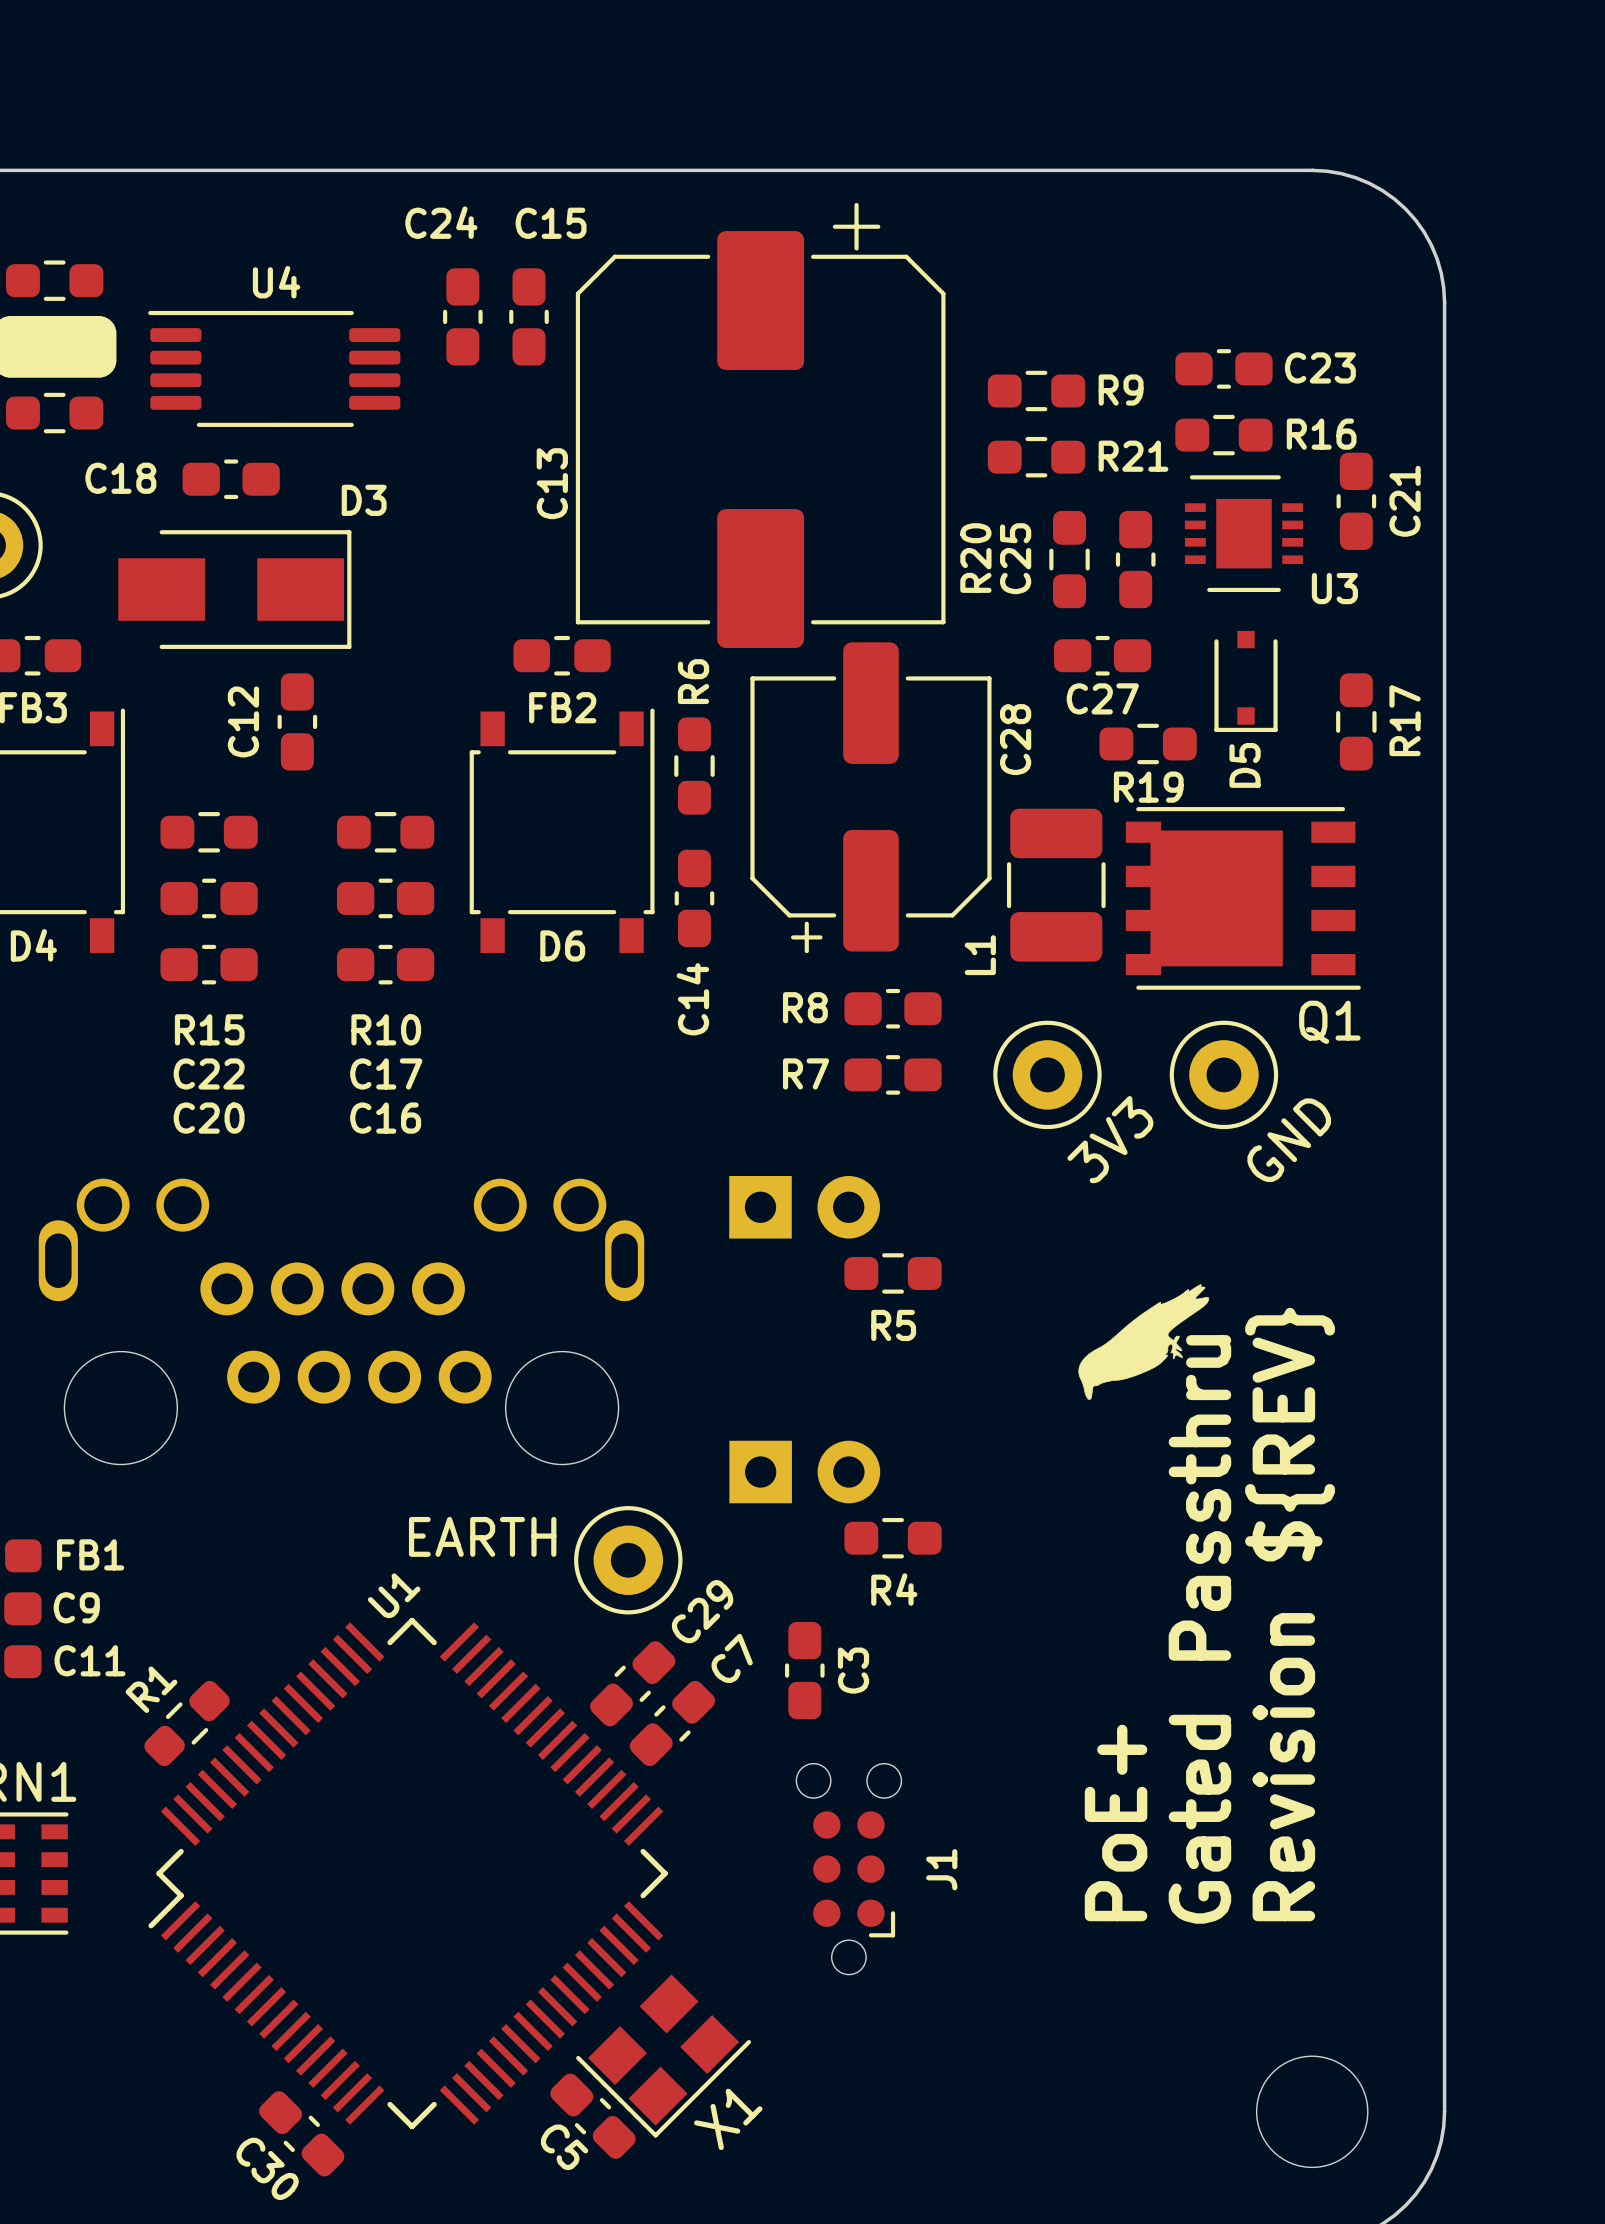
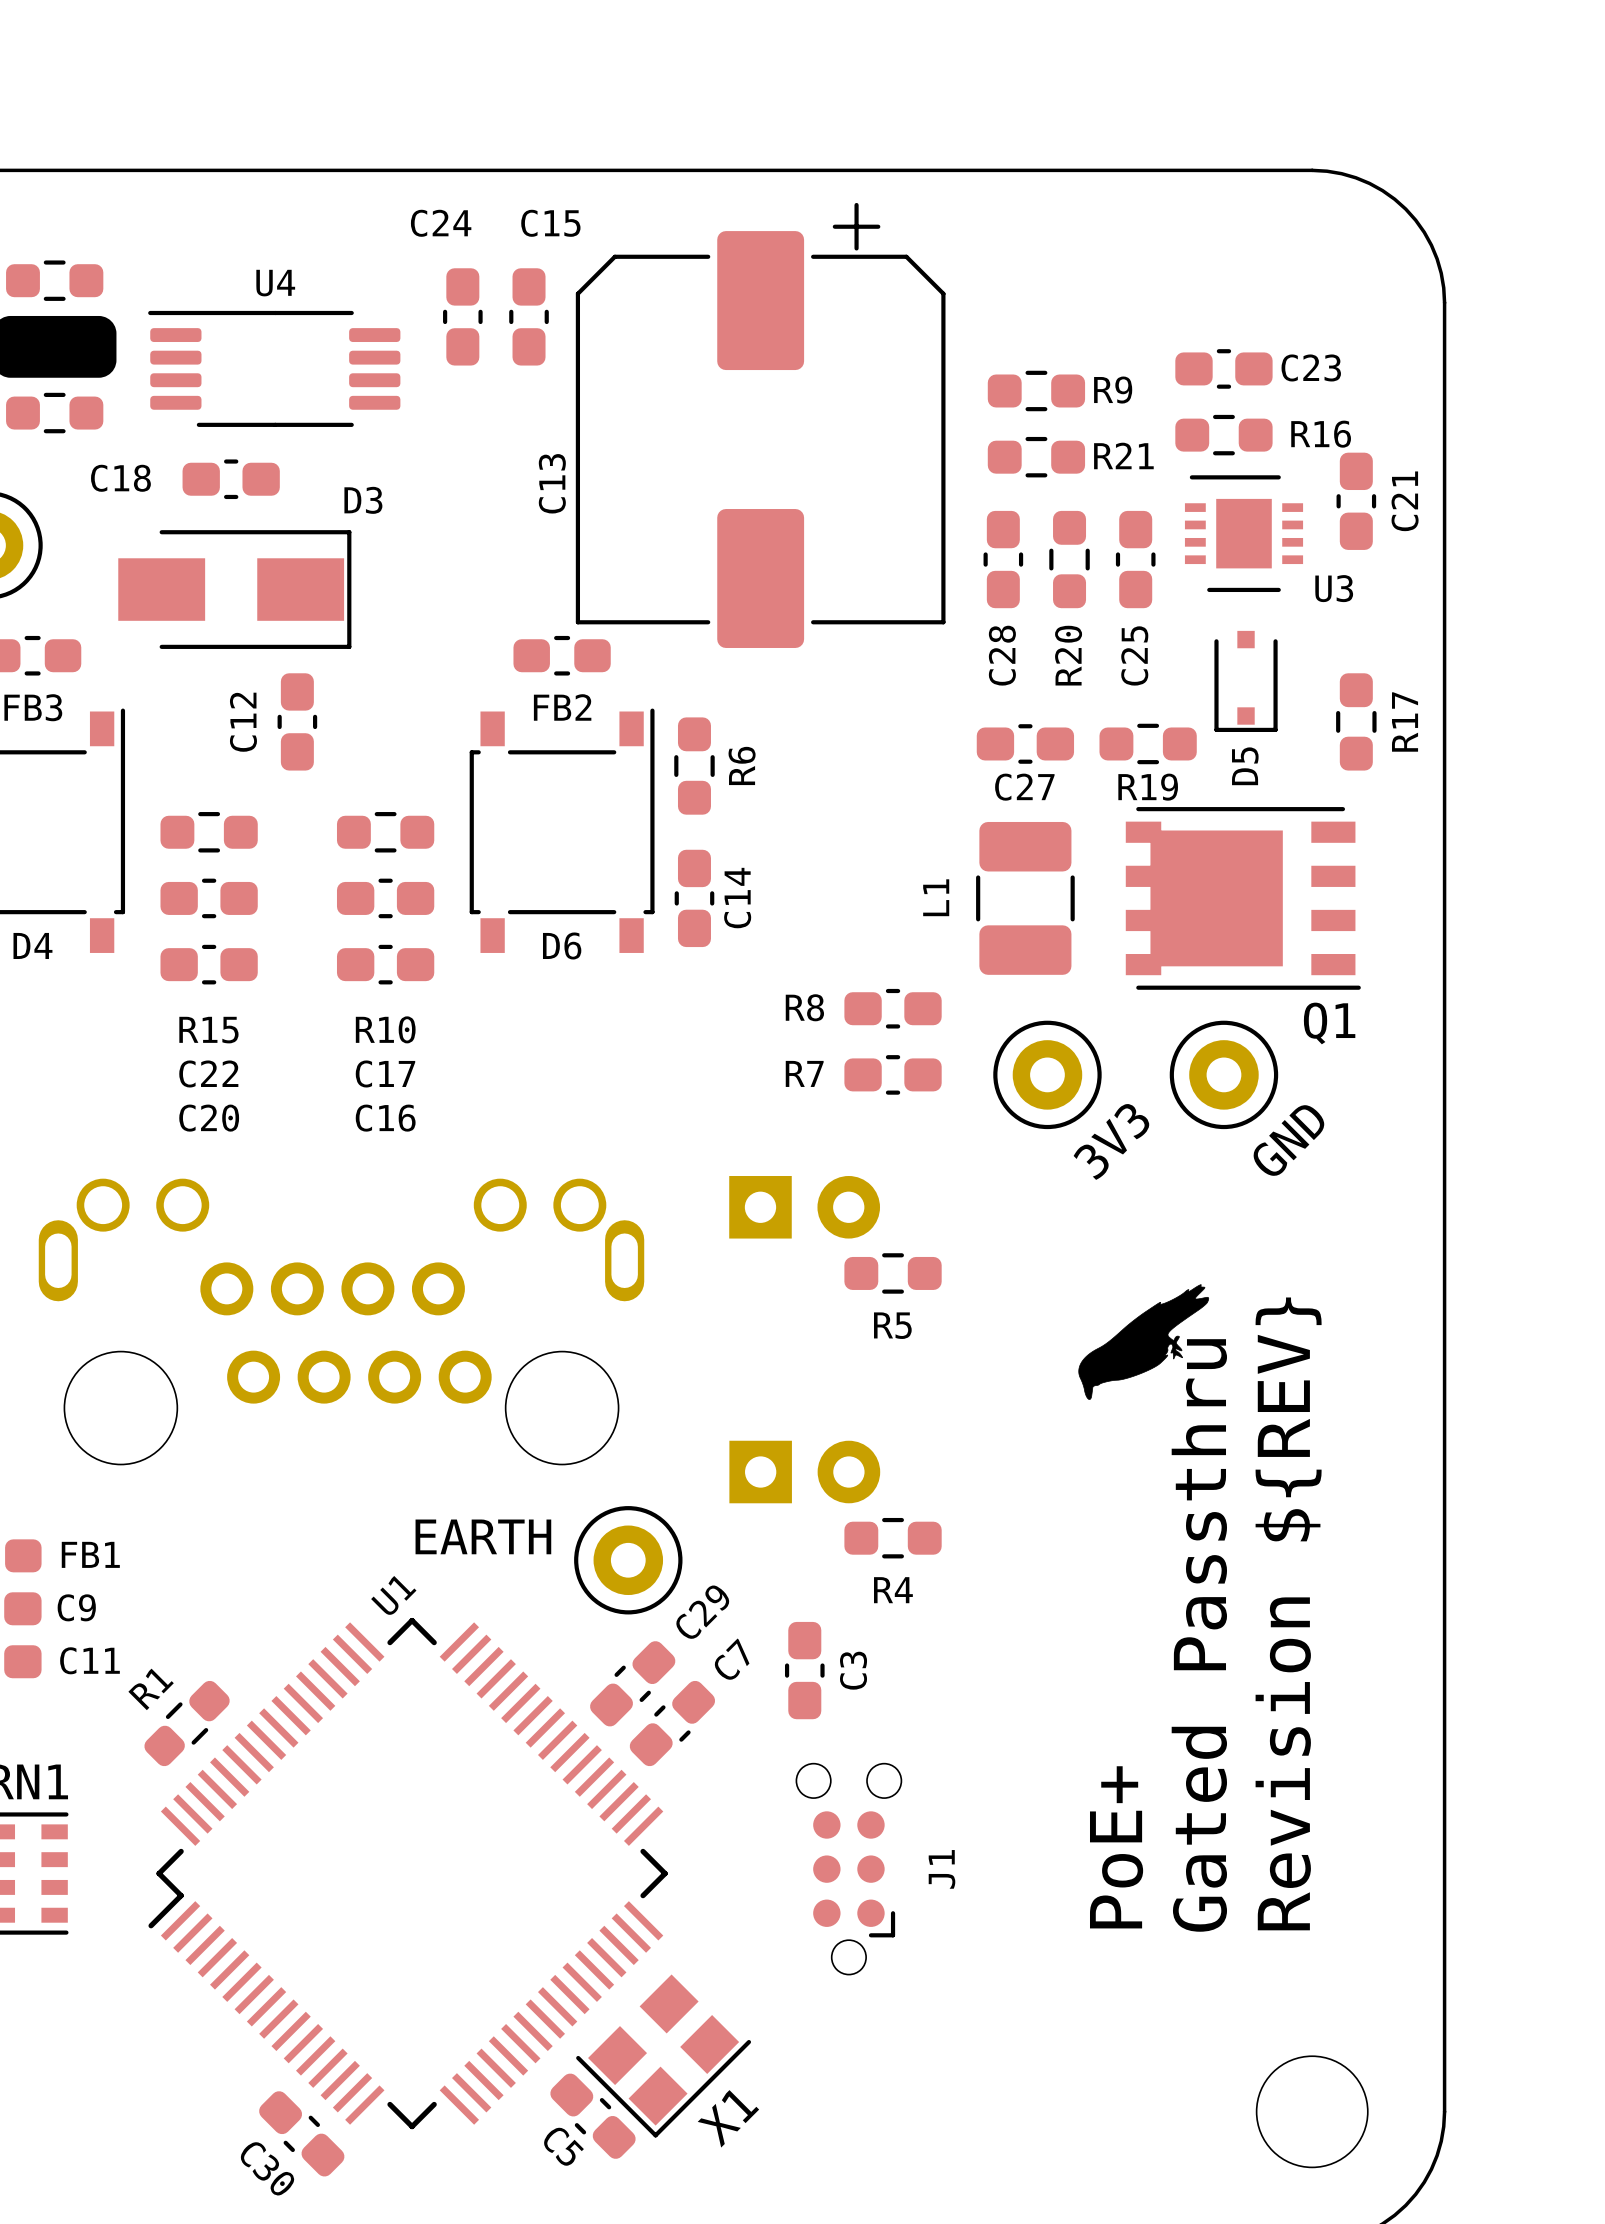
R20 name position: R20 (975, 558) -> R20 (1068, 655)
C25 name position: C25 (1015, 558) -> C25 (1134, 655)
C28 footprint: [750, 642, 992, 954] -> [983, 510, 1024, 609]
C27 position: (1102, 655) -> (1025, 743)
R6 name position: R6 (693, 681) -> R6 (742, 765)
C28 name position: C28 (1015, 739) -> C28 (1002, 655)
L1 position: (1056, 885) -> (1025, 898)
L1 name position: L1 (980, 955) -> L1 (936, 897)
C14 name position: C14 (692, 999) -> C14 (737, 898)

